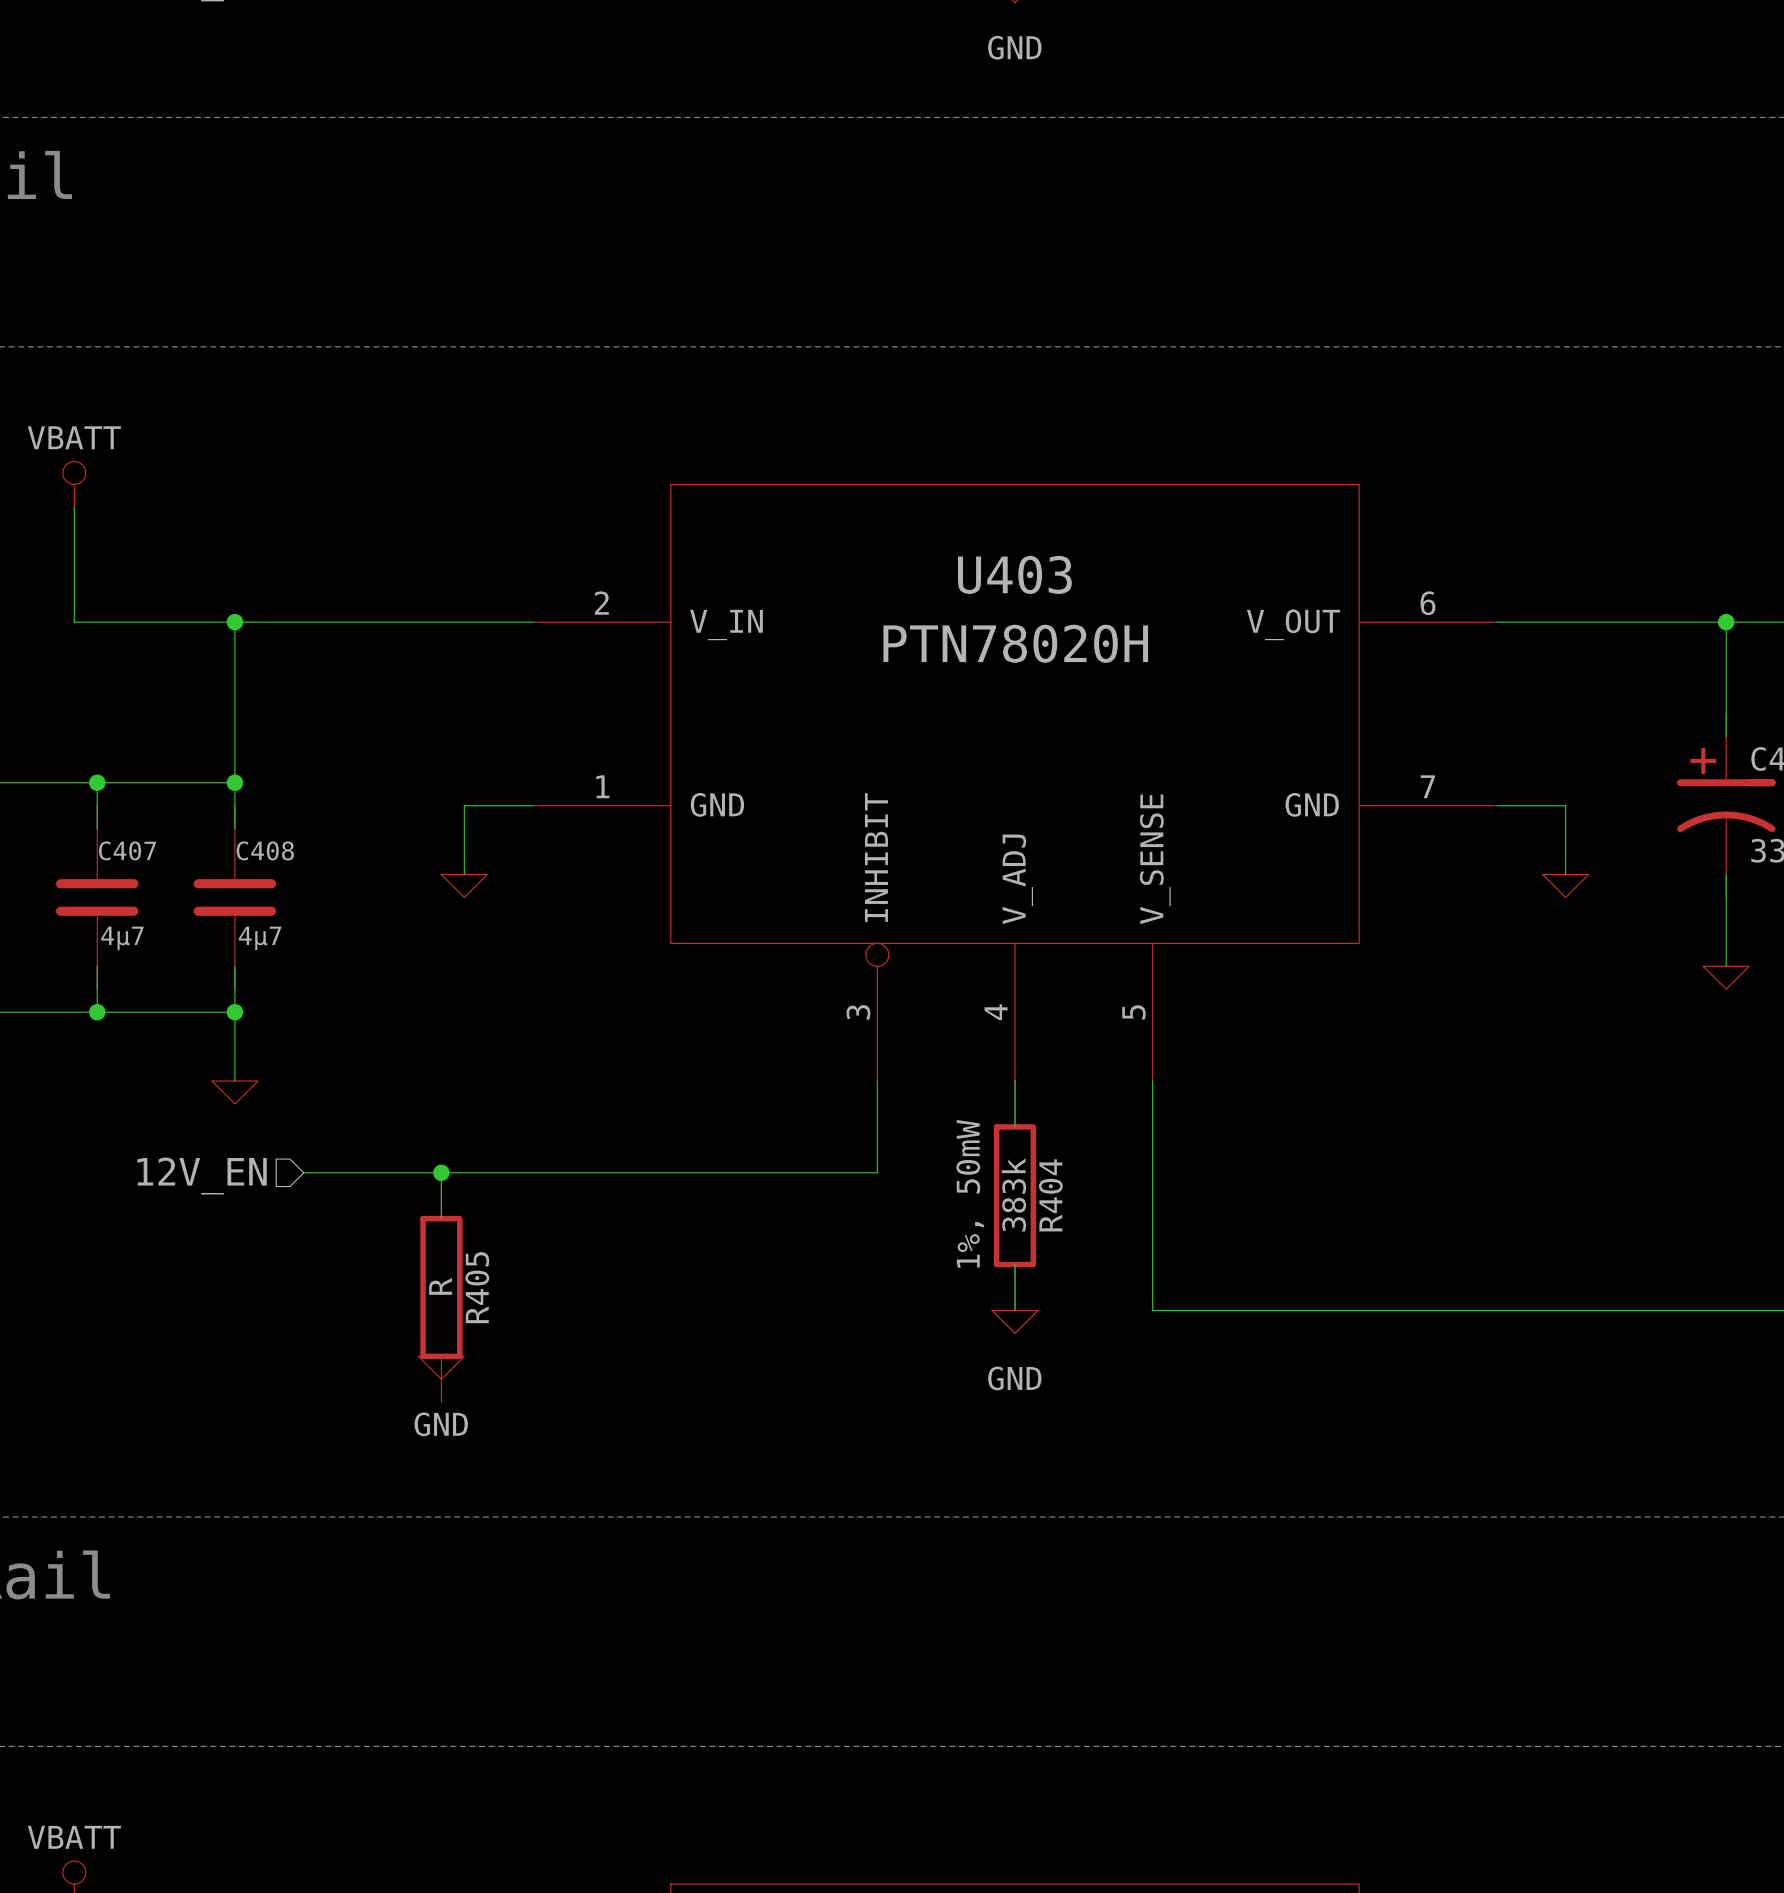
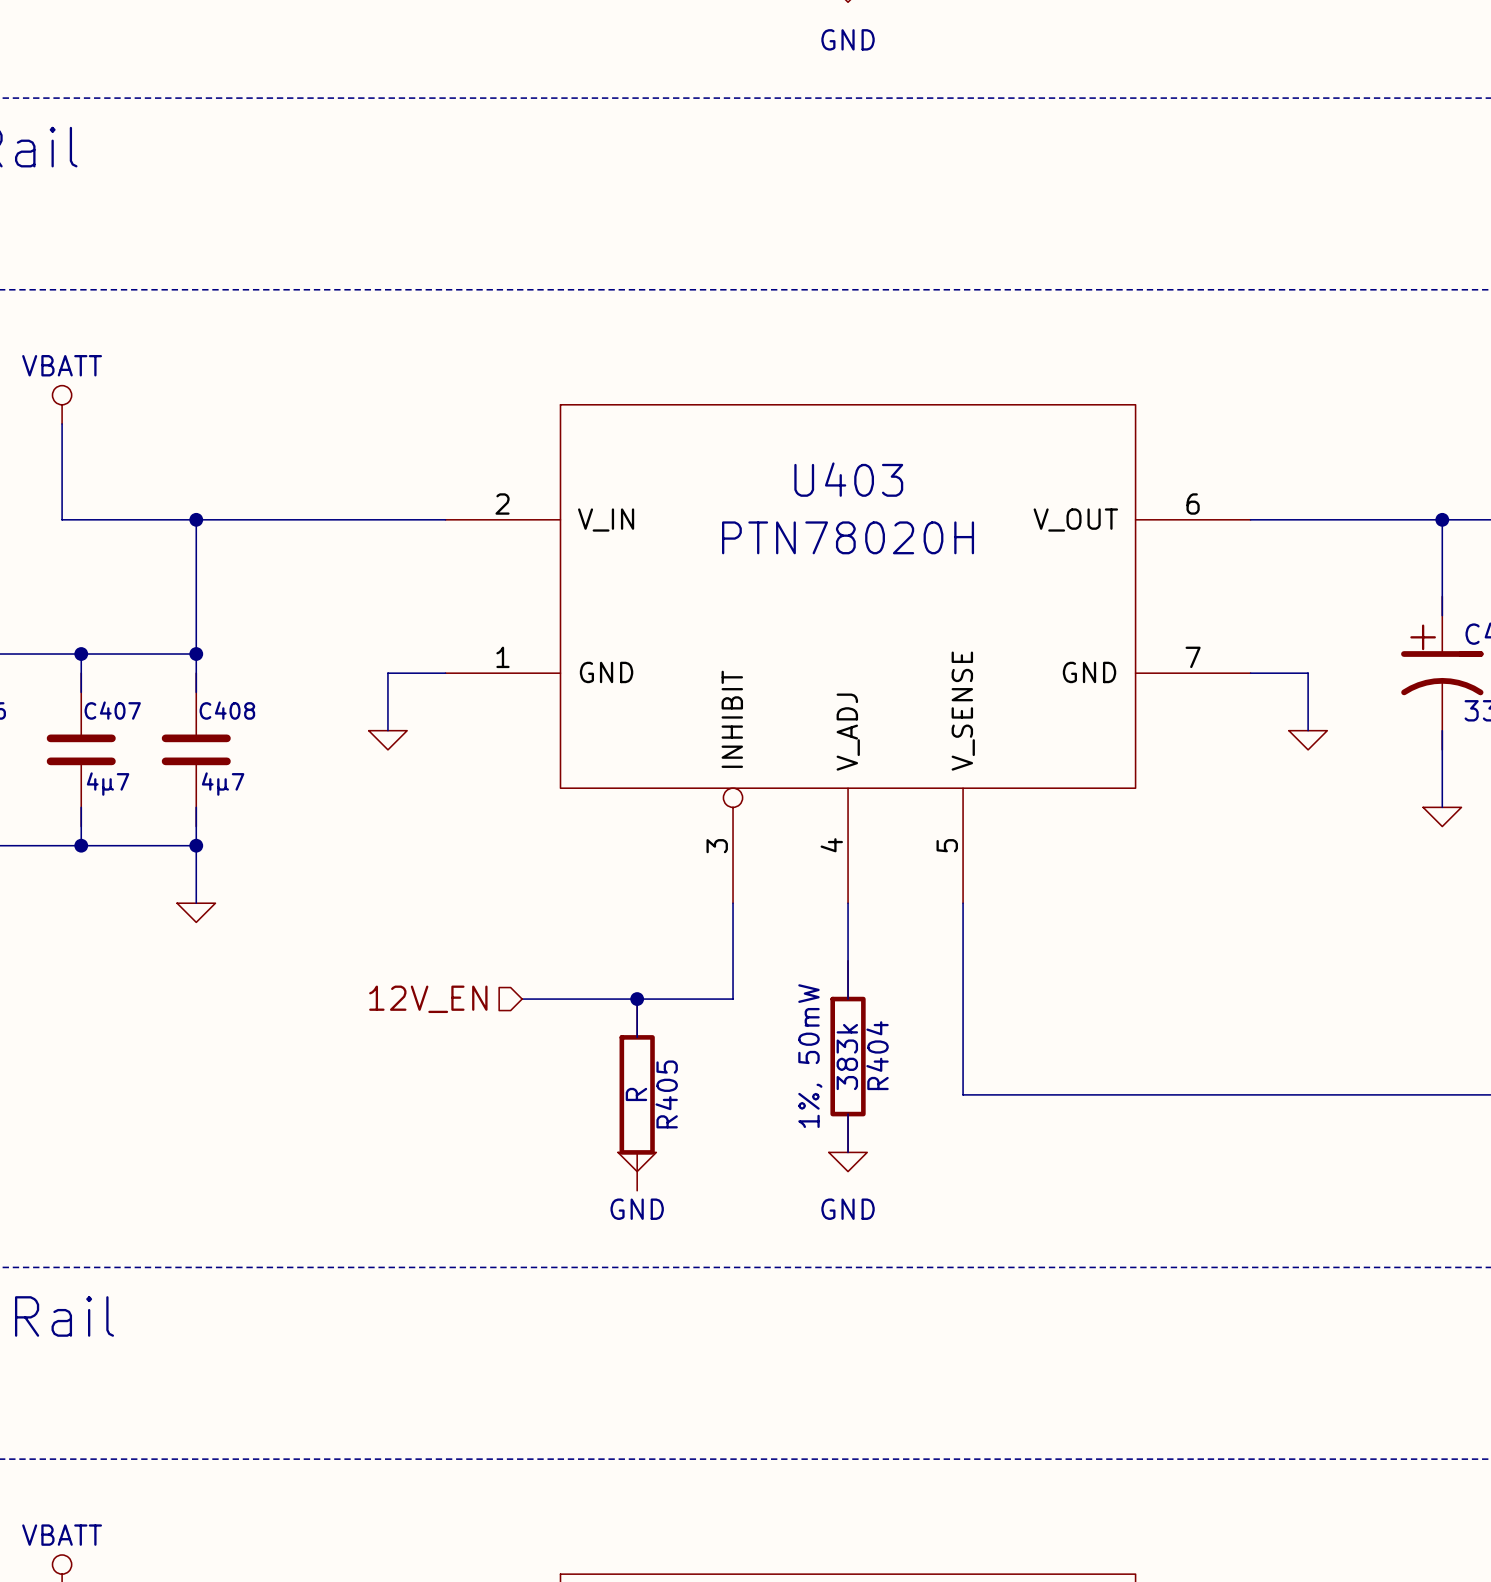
wire: none -> (848, 941) (848, 999)
wire: (303, 1172) (877, 1172) -> (522, 999) (733, 999) (733, 979)
wire: (441, 1172) (441, 1218) -> (637, 999) (637, 1037)
junction: (441, 1172) -> none
hierarchical label position: 12V_EN (202, 1175) -> 12V_EN (428, 999)
junction: none -> (637, 999)
R404 position: (1015, 1195) -> (848, 1056)
wire: (1015, 1264) (1015, 1310) -> (848, 1114) (848, 1152)
R405 position: (441, 1287) -> (637, 1094)
power symbol position: GND (1015, 1321) -> GND (848, 1162)
power symbol: GND (441, 1367) -> none
power symbol: none -> GND (637, 1162)

